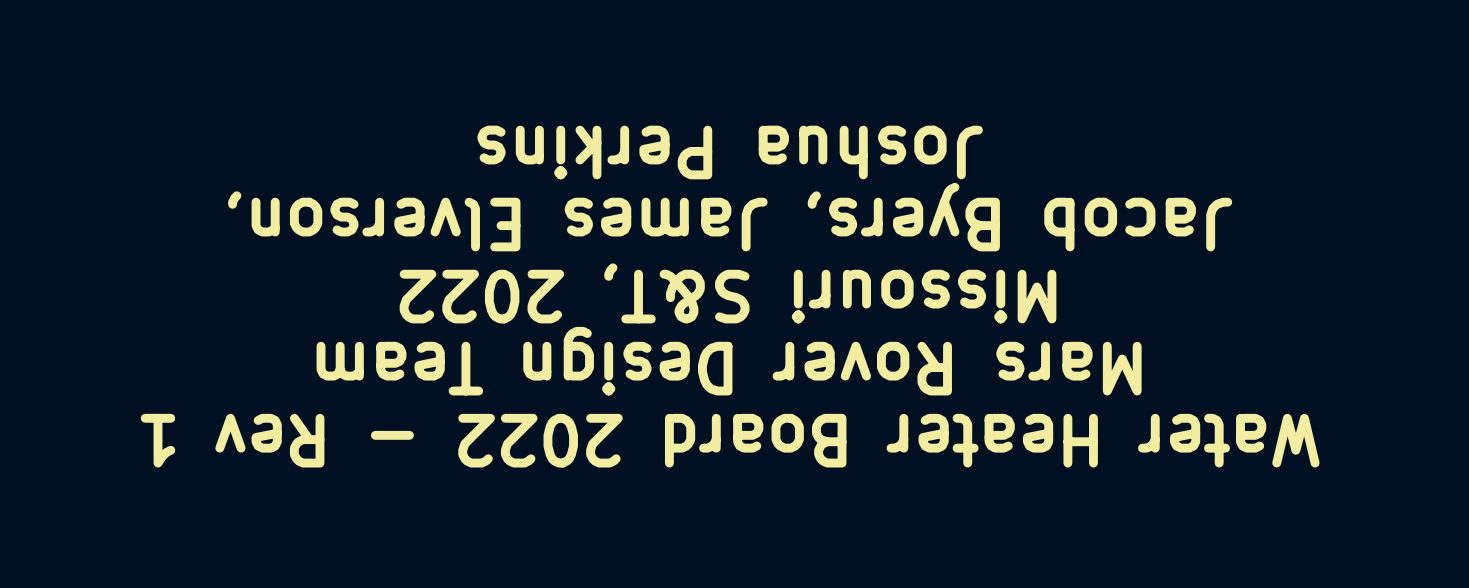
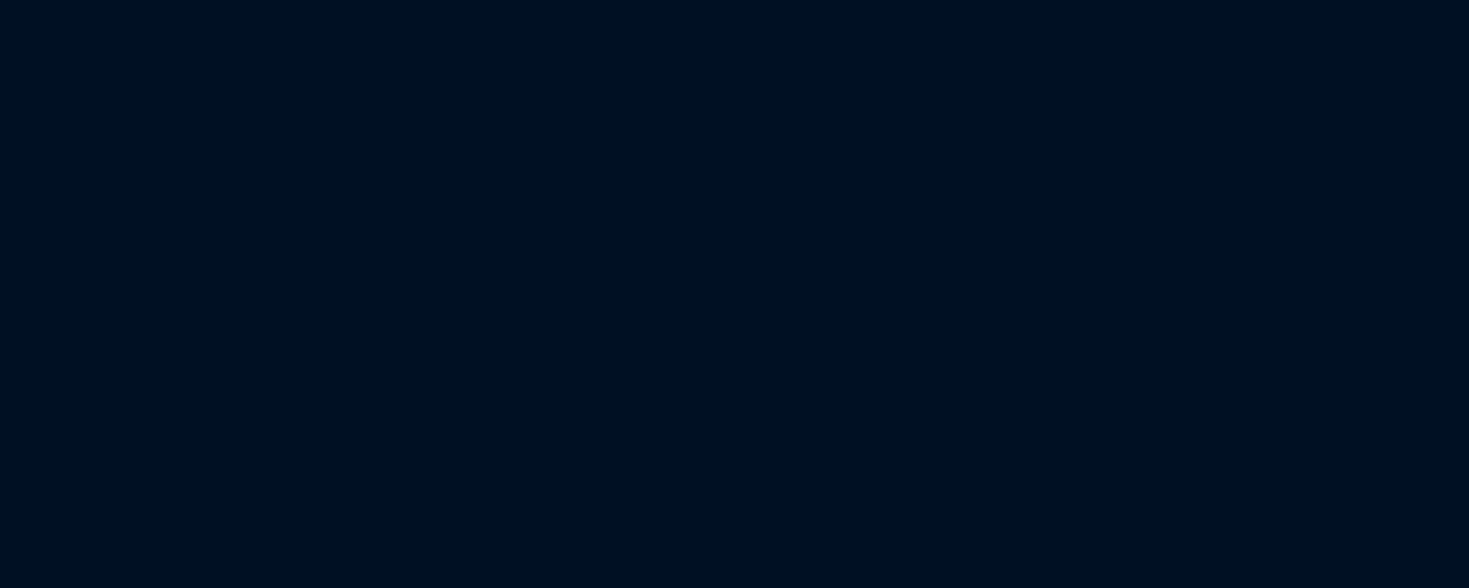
text: Joshua Perkins (730, 152) -> none
text: Jacob Byers, James Elverson, (730, 217) -> none
text: Missouri S&T, 2022 (728, 293) -> none
text: Mars Rover Design Team (729, 361) -> none
text: Water Heater Board 2022 - Rev 1 (730, 440) -> none

